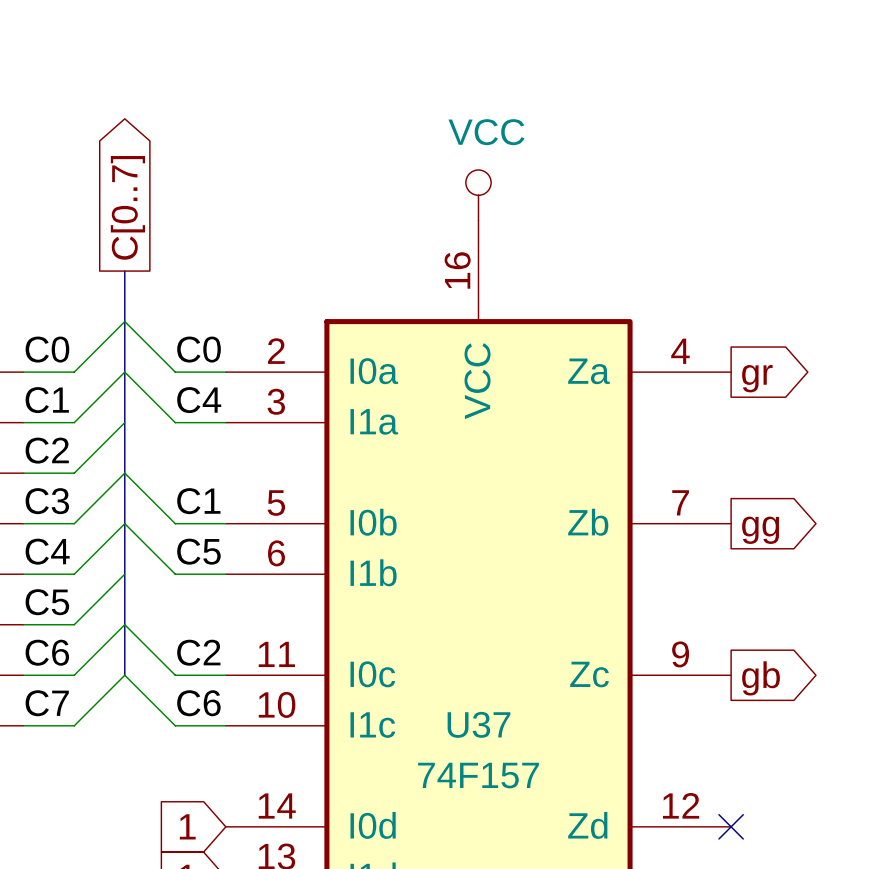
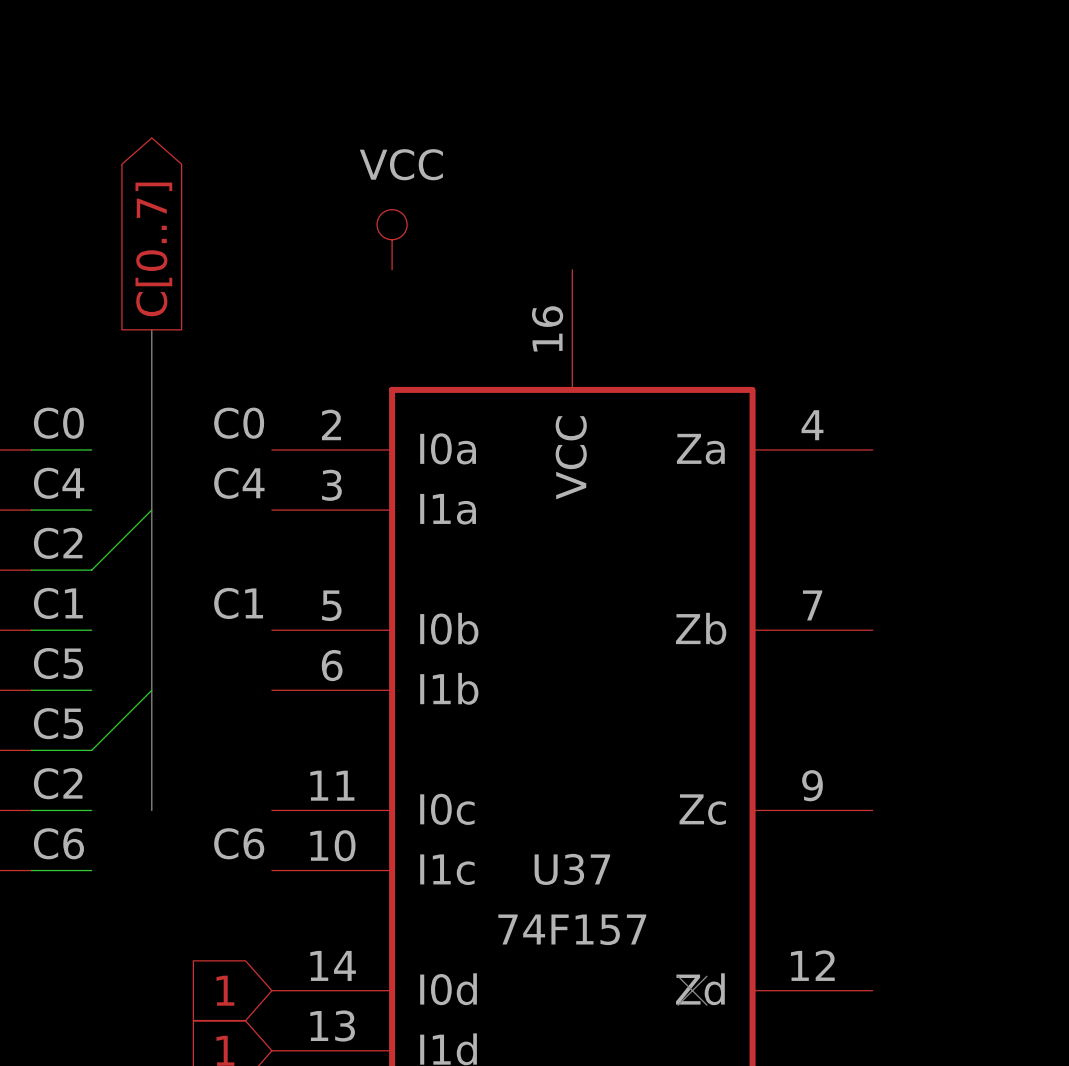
power symbol position: VCC (478, 195) -> VCC (392, 239)
wire: (74, 372) (124, 321) (175, 372) (225, 372) -> none
global label: gr (757, 378) -> none
label: C1 (47, 400) -> C4 (59, 483)
wire: (74, 422) (124, 372) (175, 422) (225, 422) -> none
label: C3 (47, 501) -> C1 (58, 603)
wire: (74, 523) (124, 473) (175, 523) (225, 523) -> none
global label: gg (760, 530) -> none
label: C4 (47, 551) -> C5 (58, 663)
label: C5 (198, 551) -> none
wire: (74, 574) (124, 523) (175, 574) (225, 574) -> none
label: C6 (47, 652) -> C2 (58, 783)
label: C2 (198, 652) -> none
wire: (74, 675) (124, 624) (175, 675) (225, 675) -> none
global label: gb (761, 678) -> none
label: C7 (47, 703) -> C6 (58, 843)
wire: (74, 725) (124, 675) (175, 725) (225, 725) -> none
no-connect mark: none -> (692, 990)
no-connect mark: (731, 826) -> none

